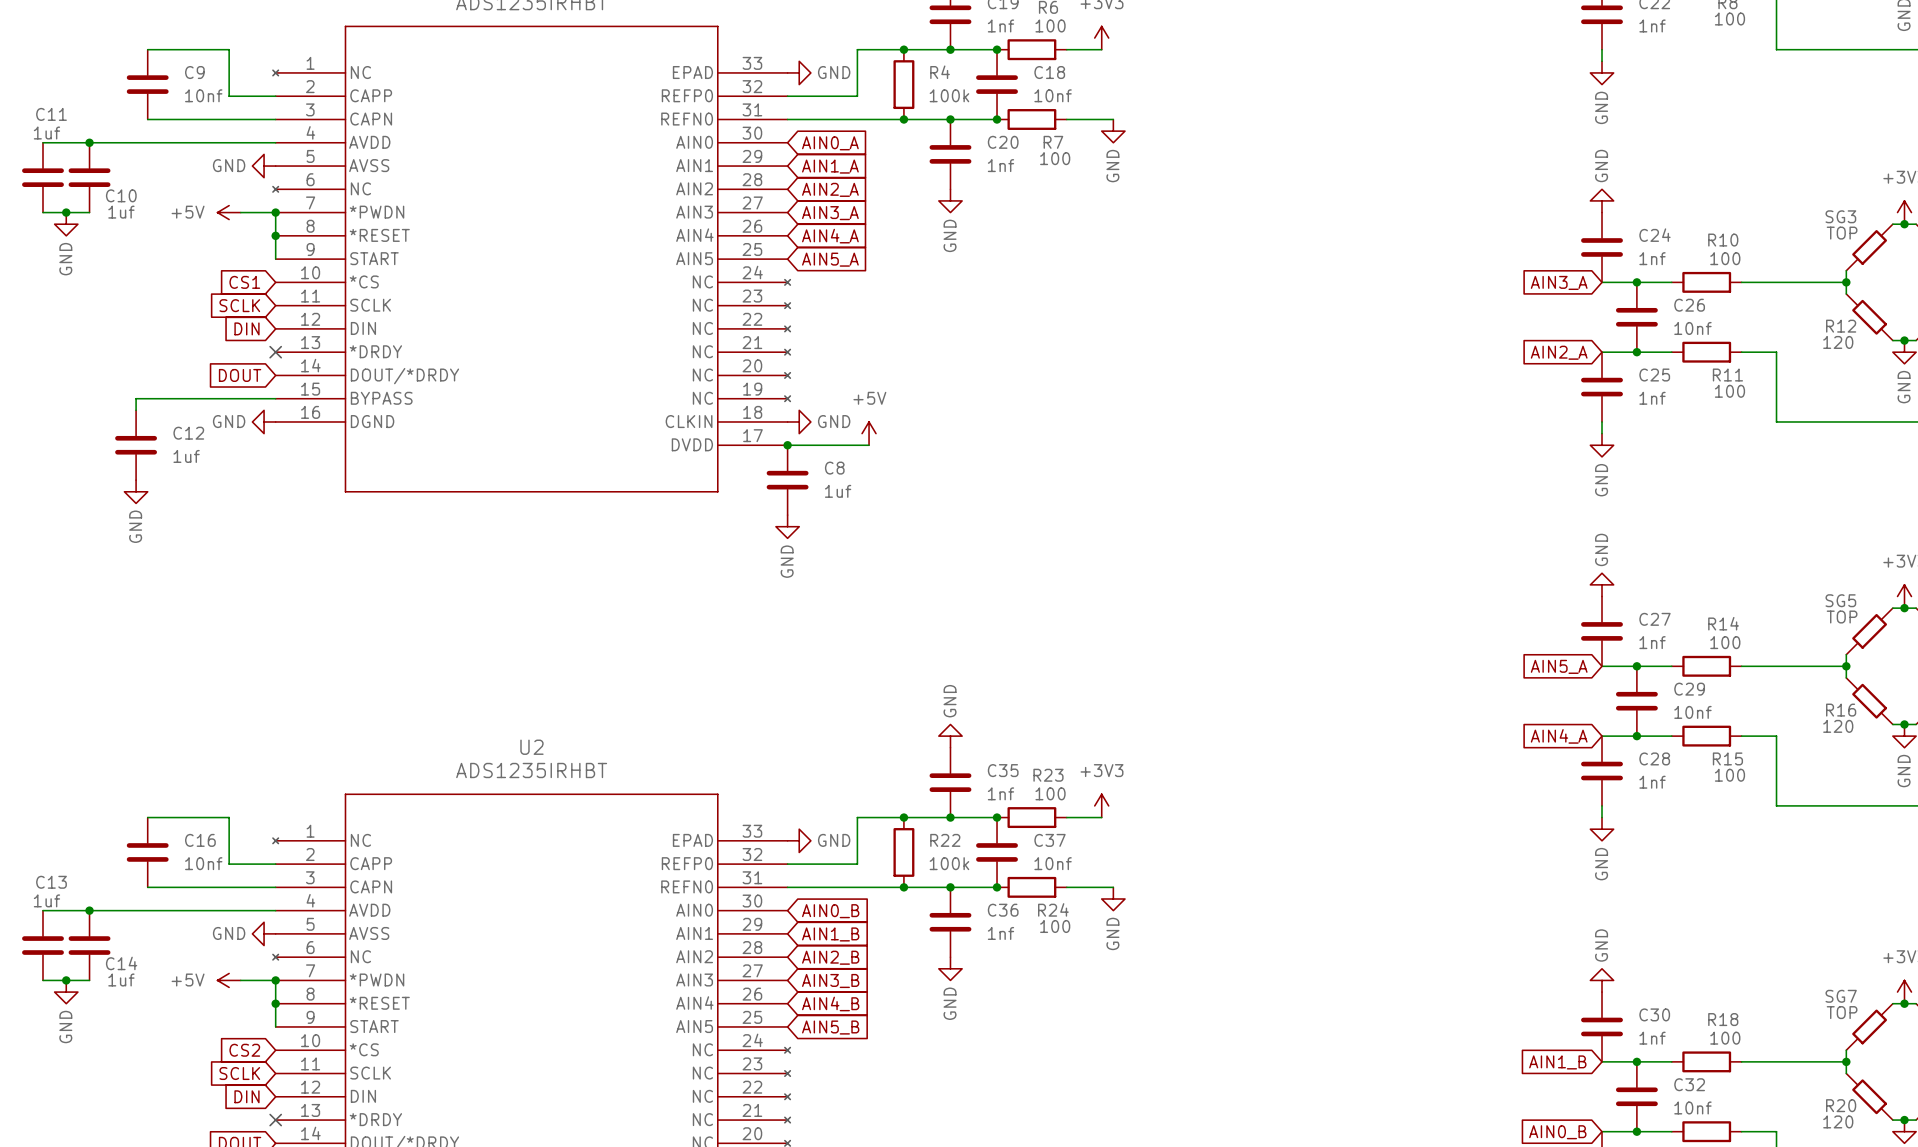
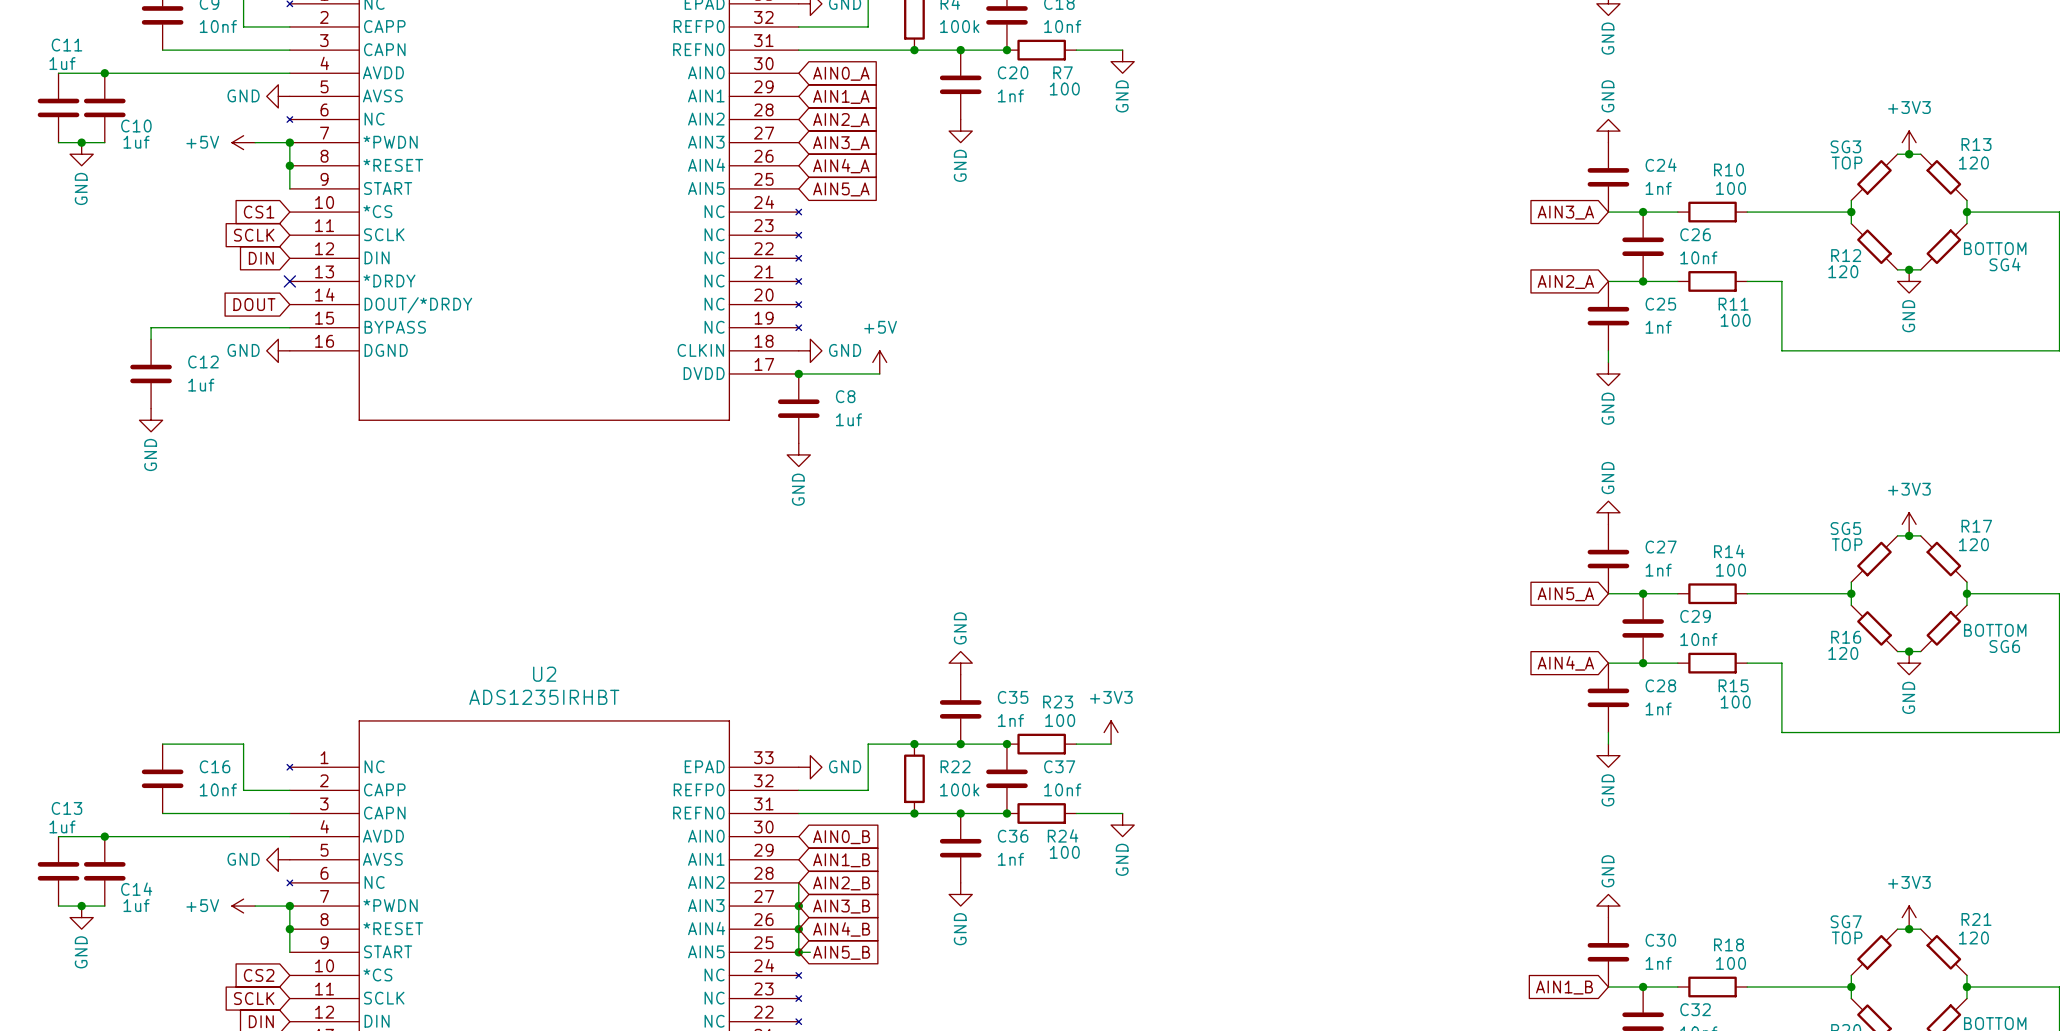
wire: none -> (798, 882) (798, 952) (810, 952)
junction: none -> (798, 906)
junction: none -> (798, 929)
junction: none -> (798, 952)

